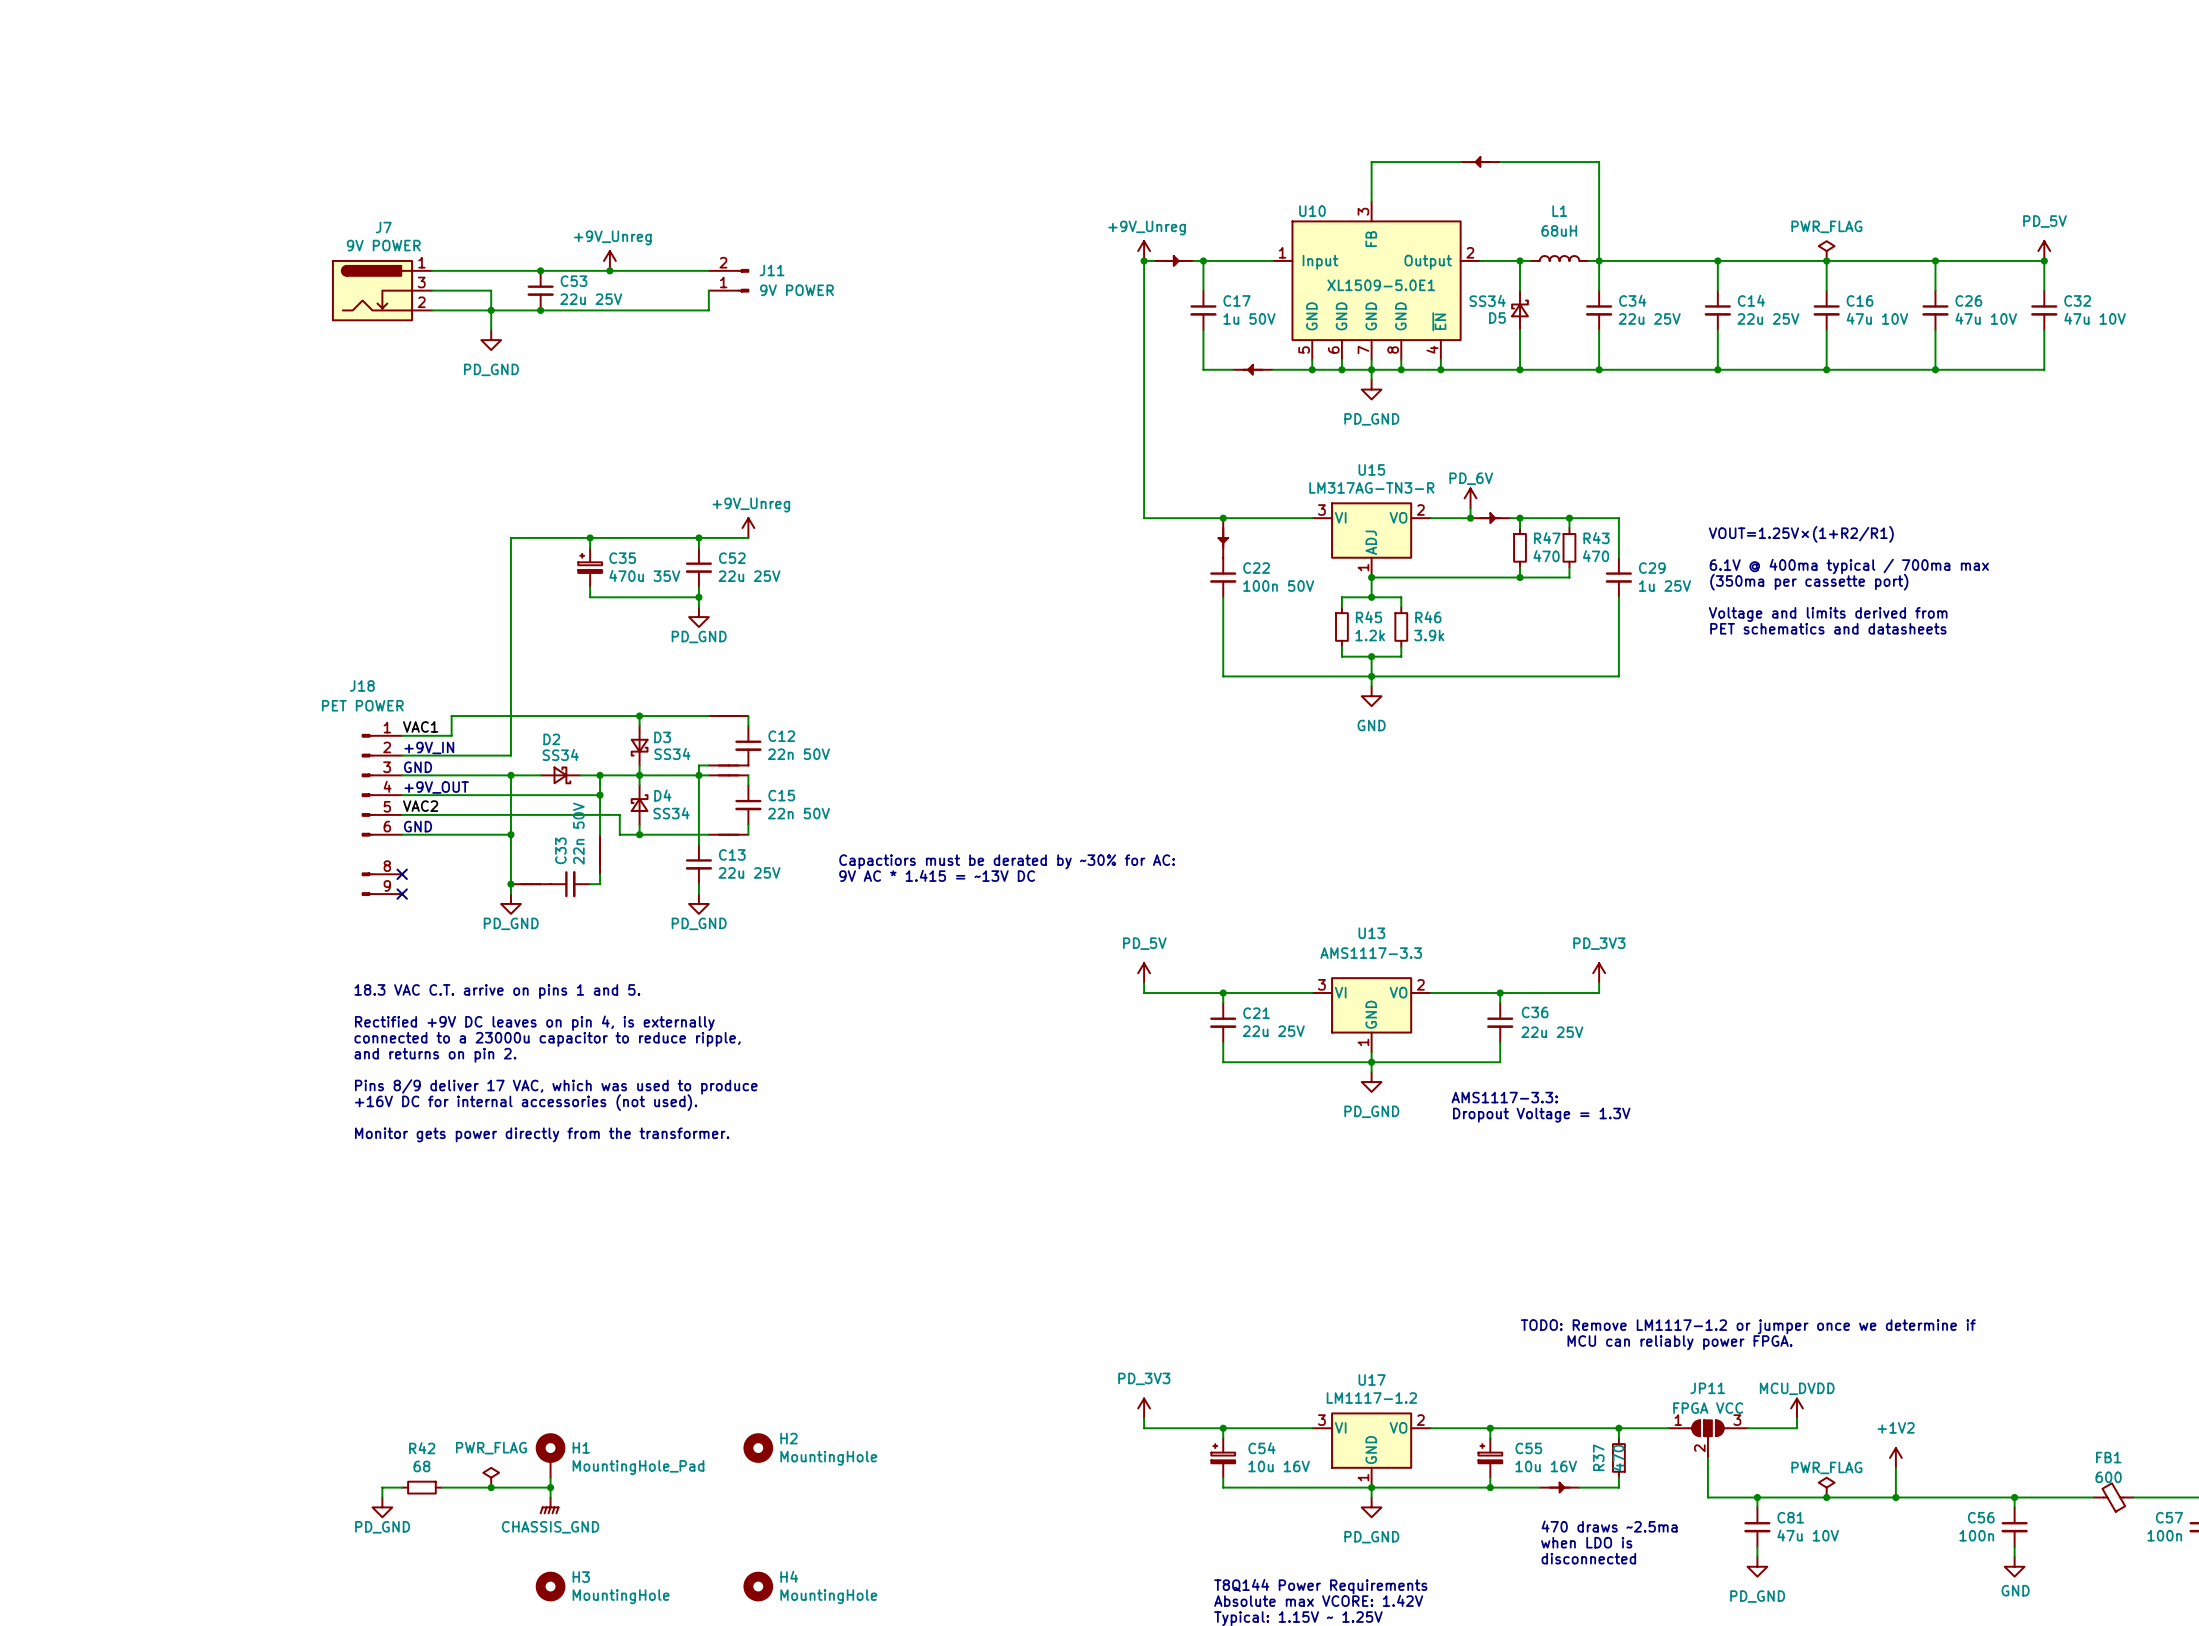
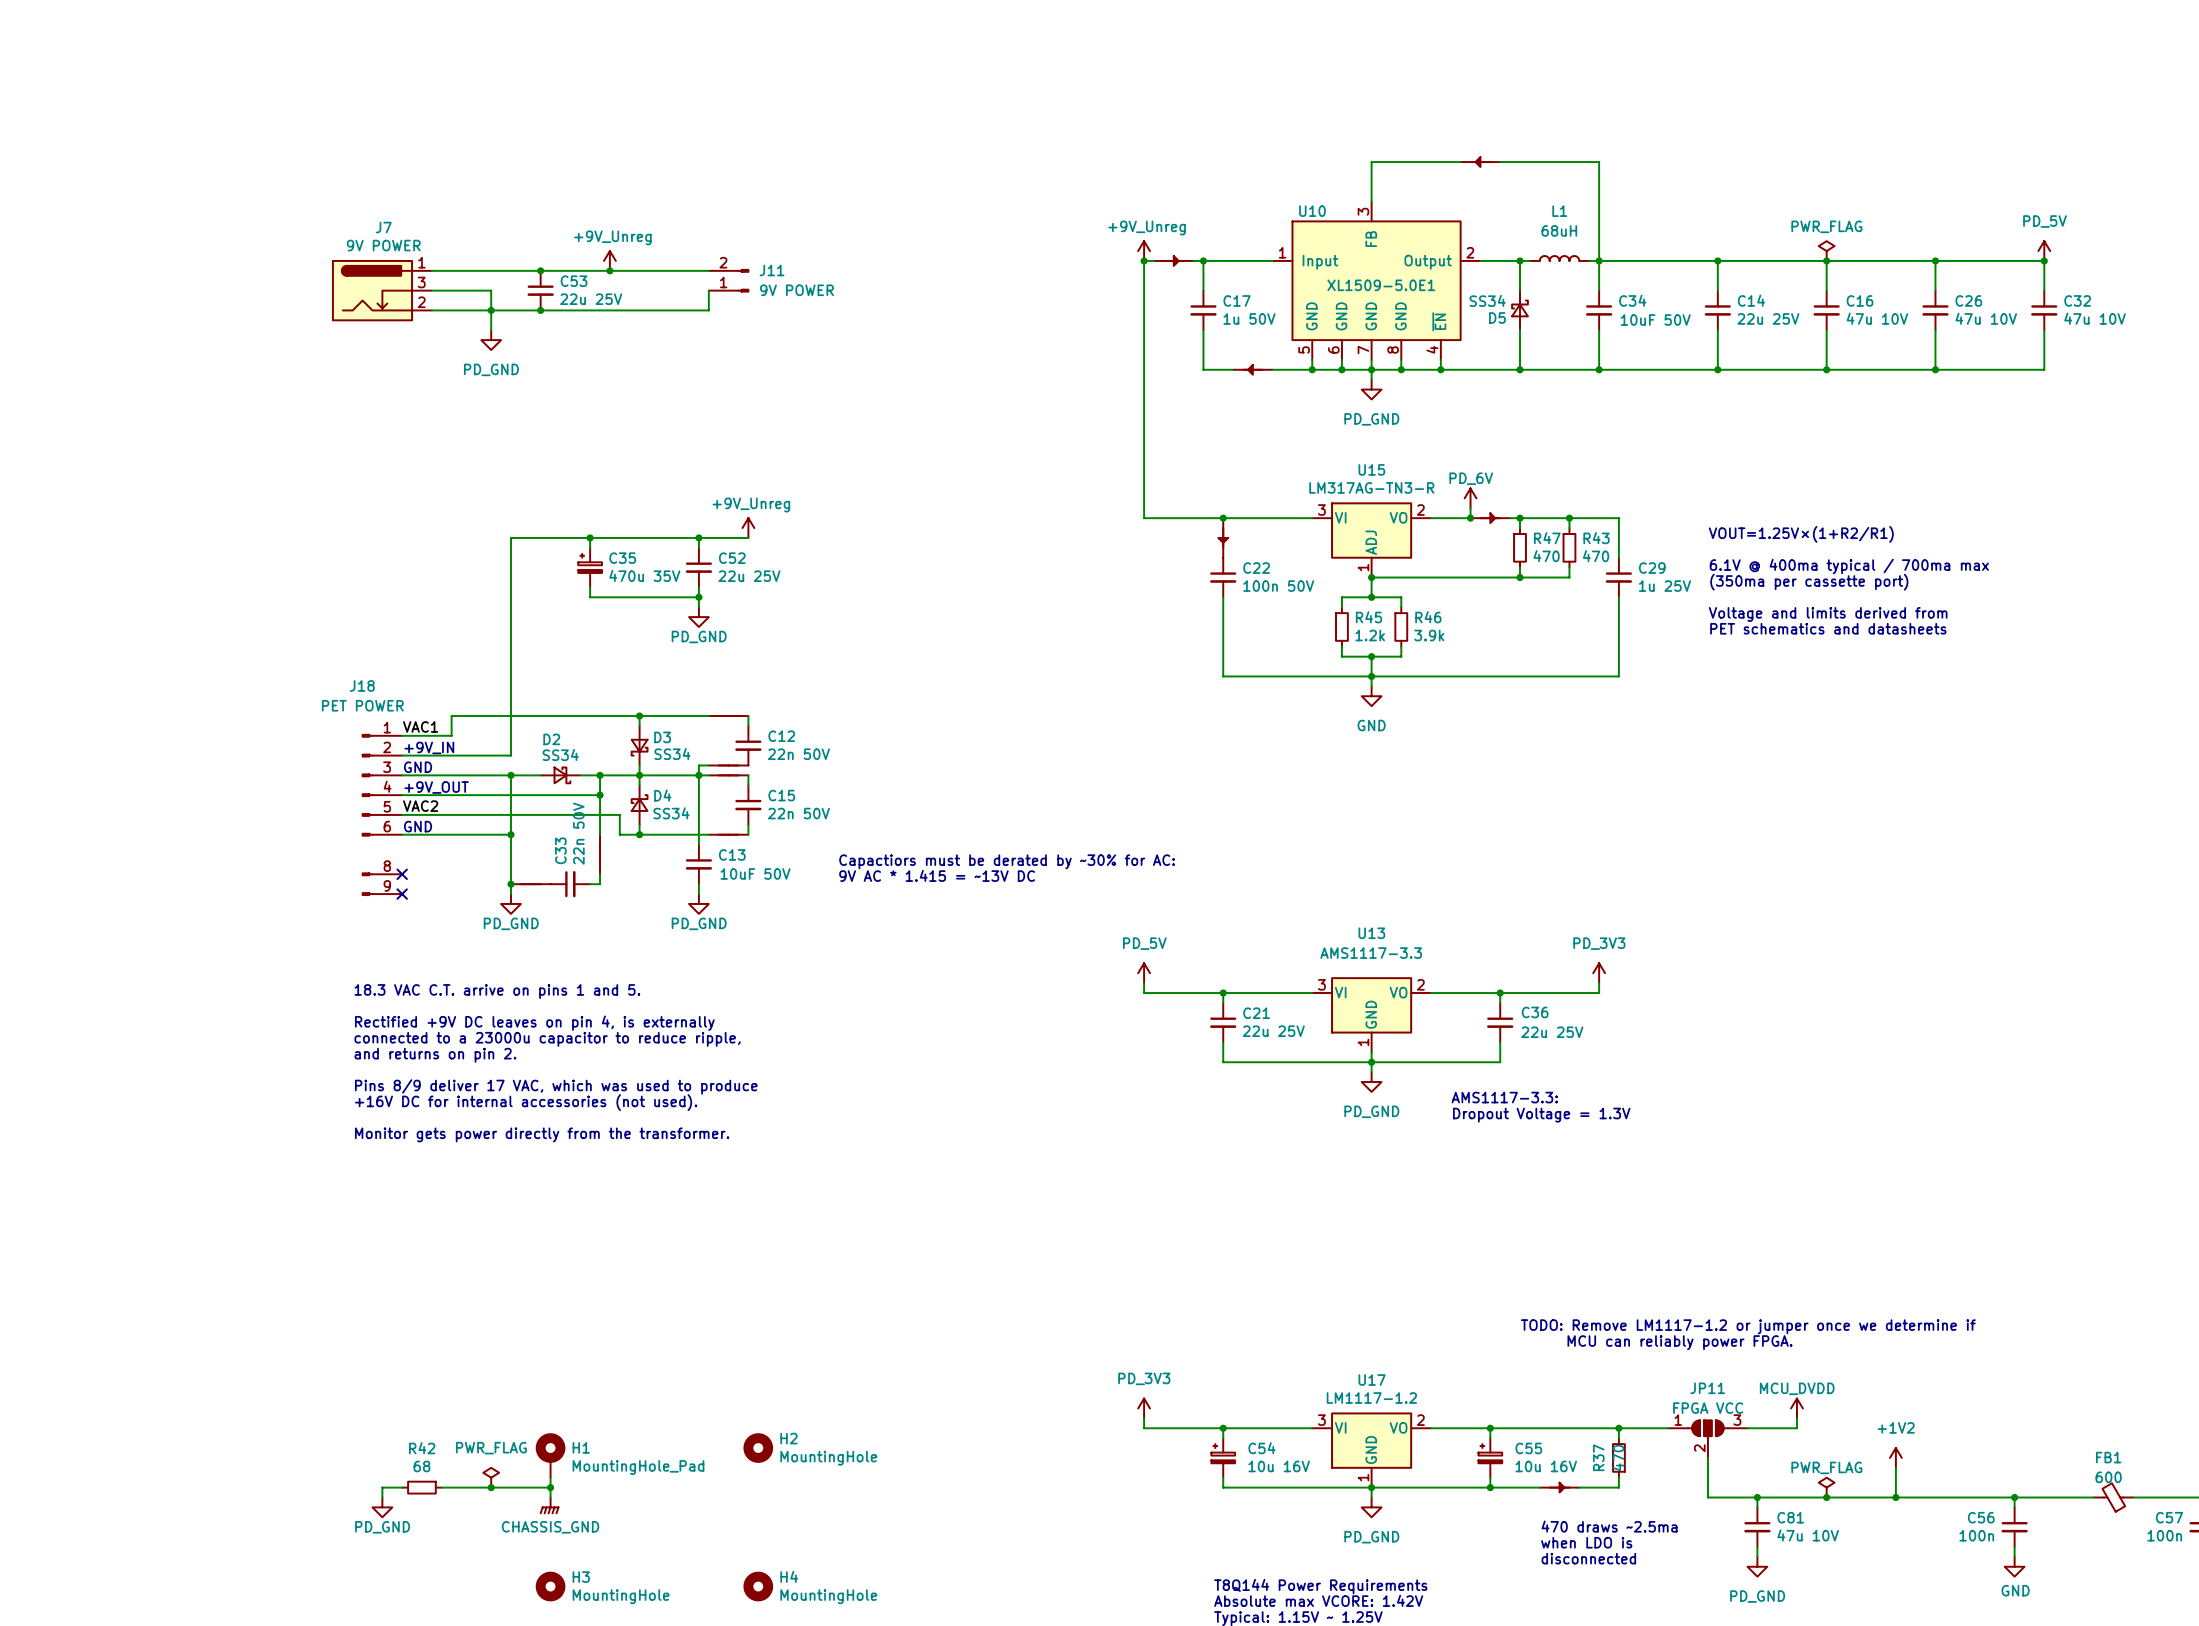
C34 value: 22u 25V (1649, 318) -> 10uF 50V (1655, 320)
C13 value: 22u 25V (749, 872) -> 10uF 50V (755, 873)

